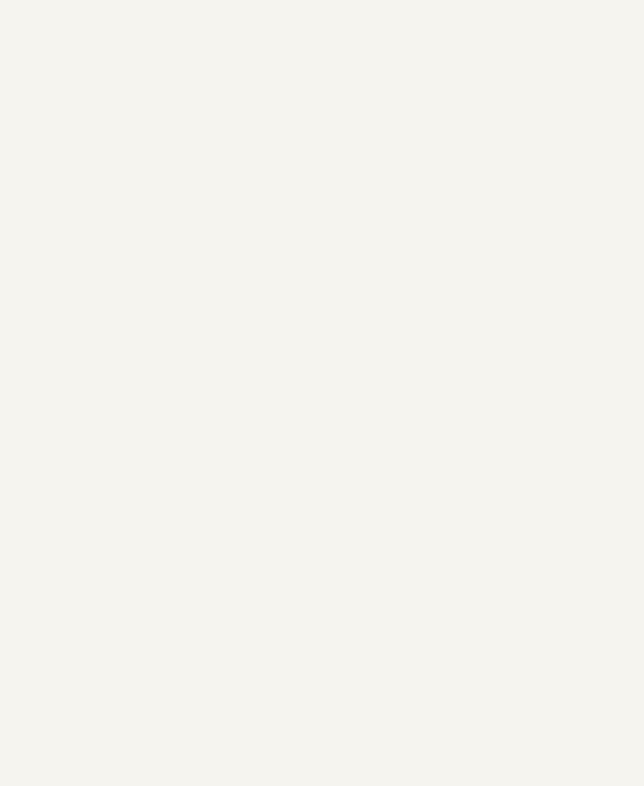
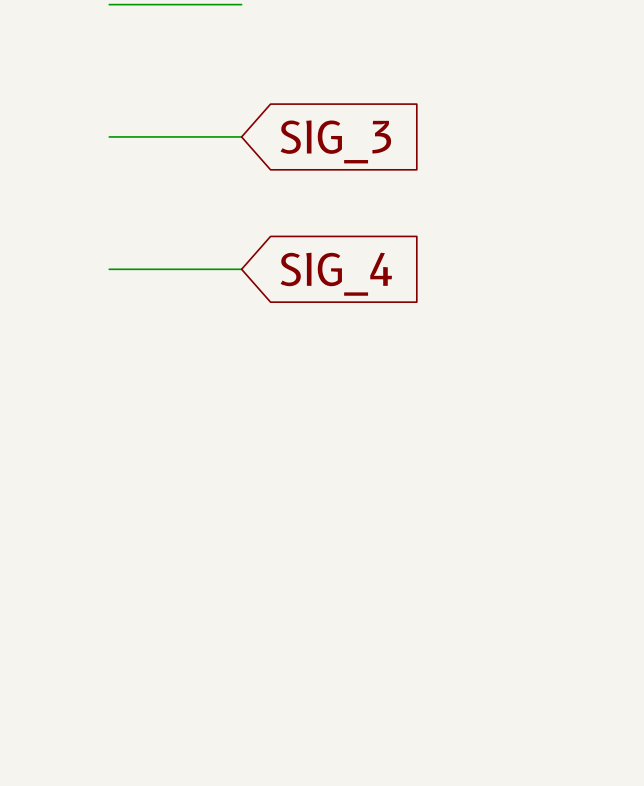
wire: none -> (109, 4) (241, 4)
wire: none -> (109, 136) (241, 136)
global label: none -> SIG_3 (335, 141)
wire: none -> (109, 269) (241, 269)
global label: none -> SIG_4 (336, 274)

